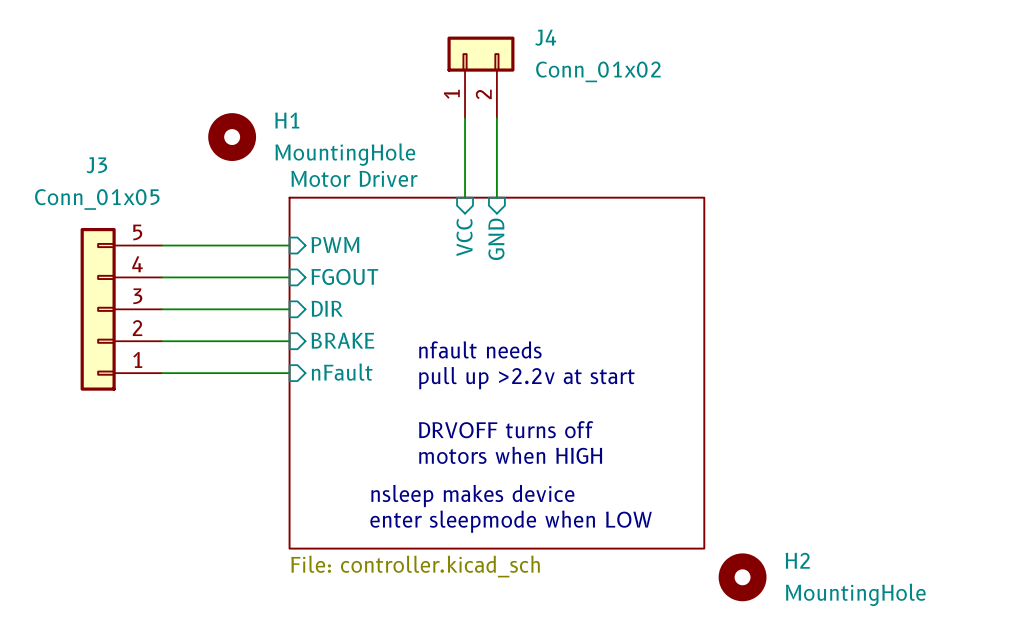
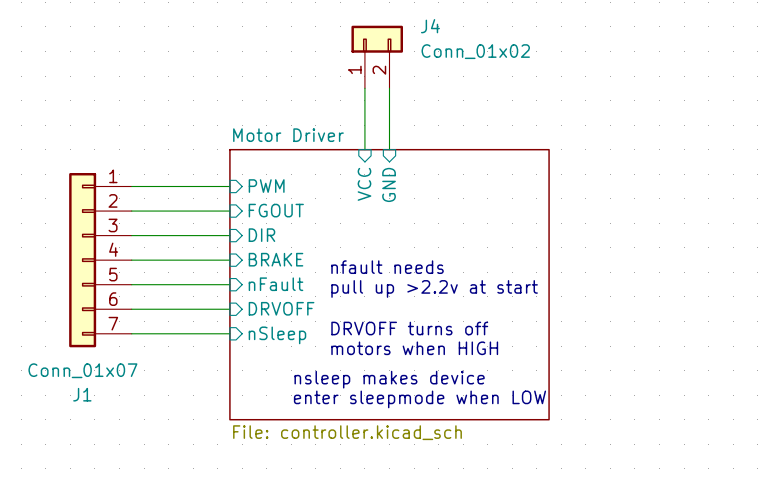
H1: MountingHole (232, 137) -> none
J3: Conn_01x05 (121, 309) -> none
J1: none -> Conn_01x07 (100, 260)
sheet pin: none -> DRVOFF (281, 308)
wire: none -> (131, 309) (229, 309)
wire: none -> (131, 333) (229, 333)
sheet pin: none -> nSleep (277, 335)
H2: MountingHole (742, 577) -> none

